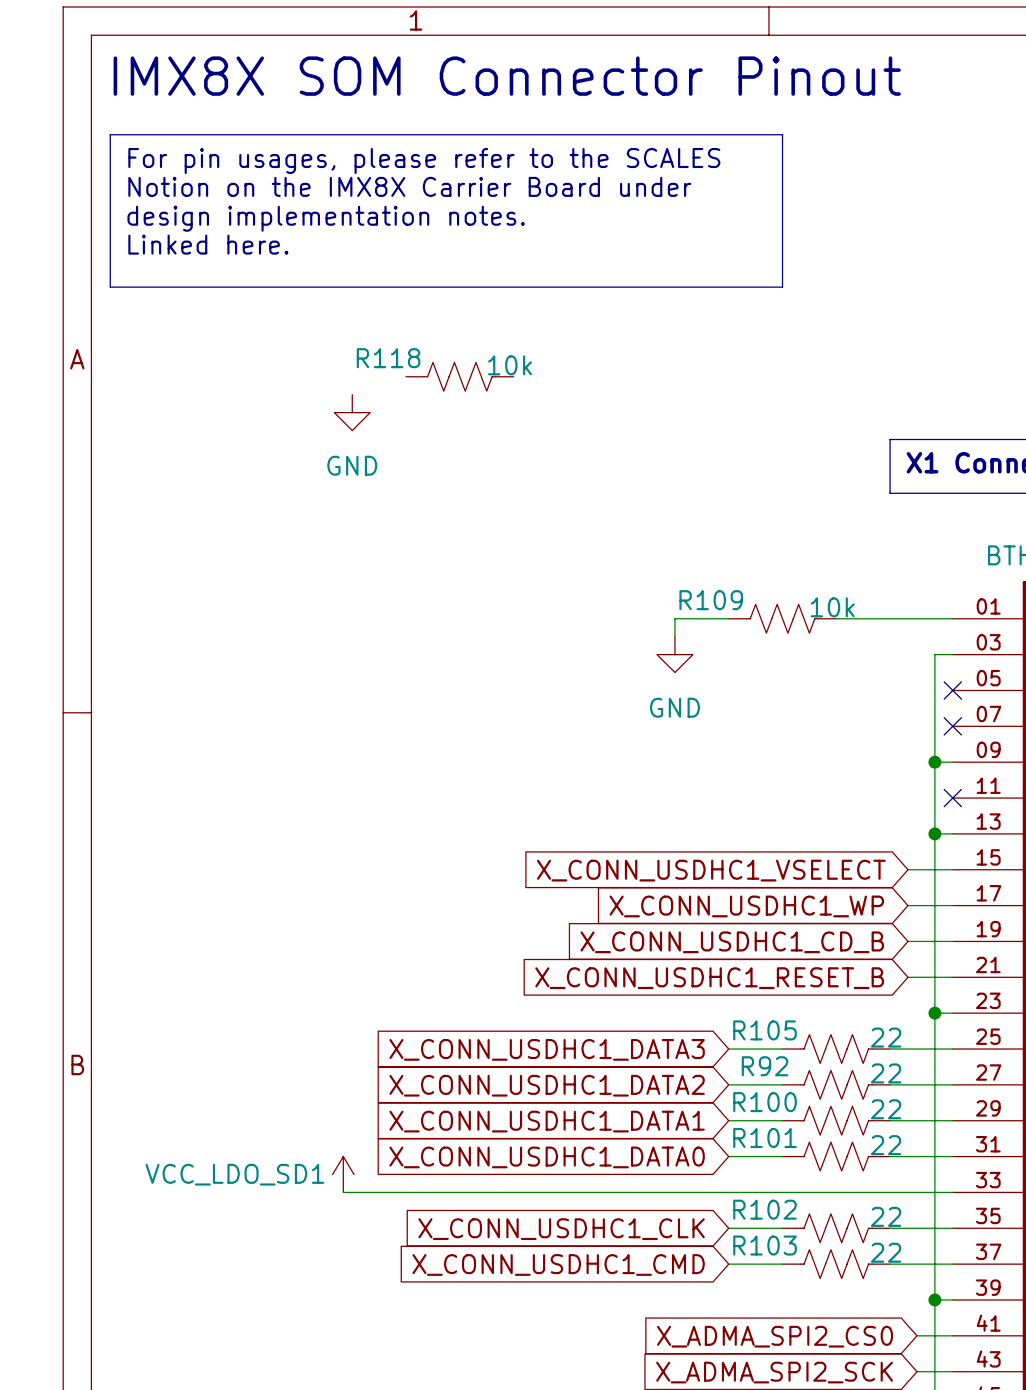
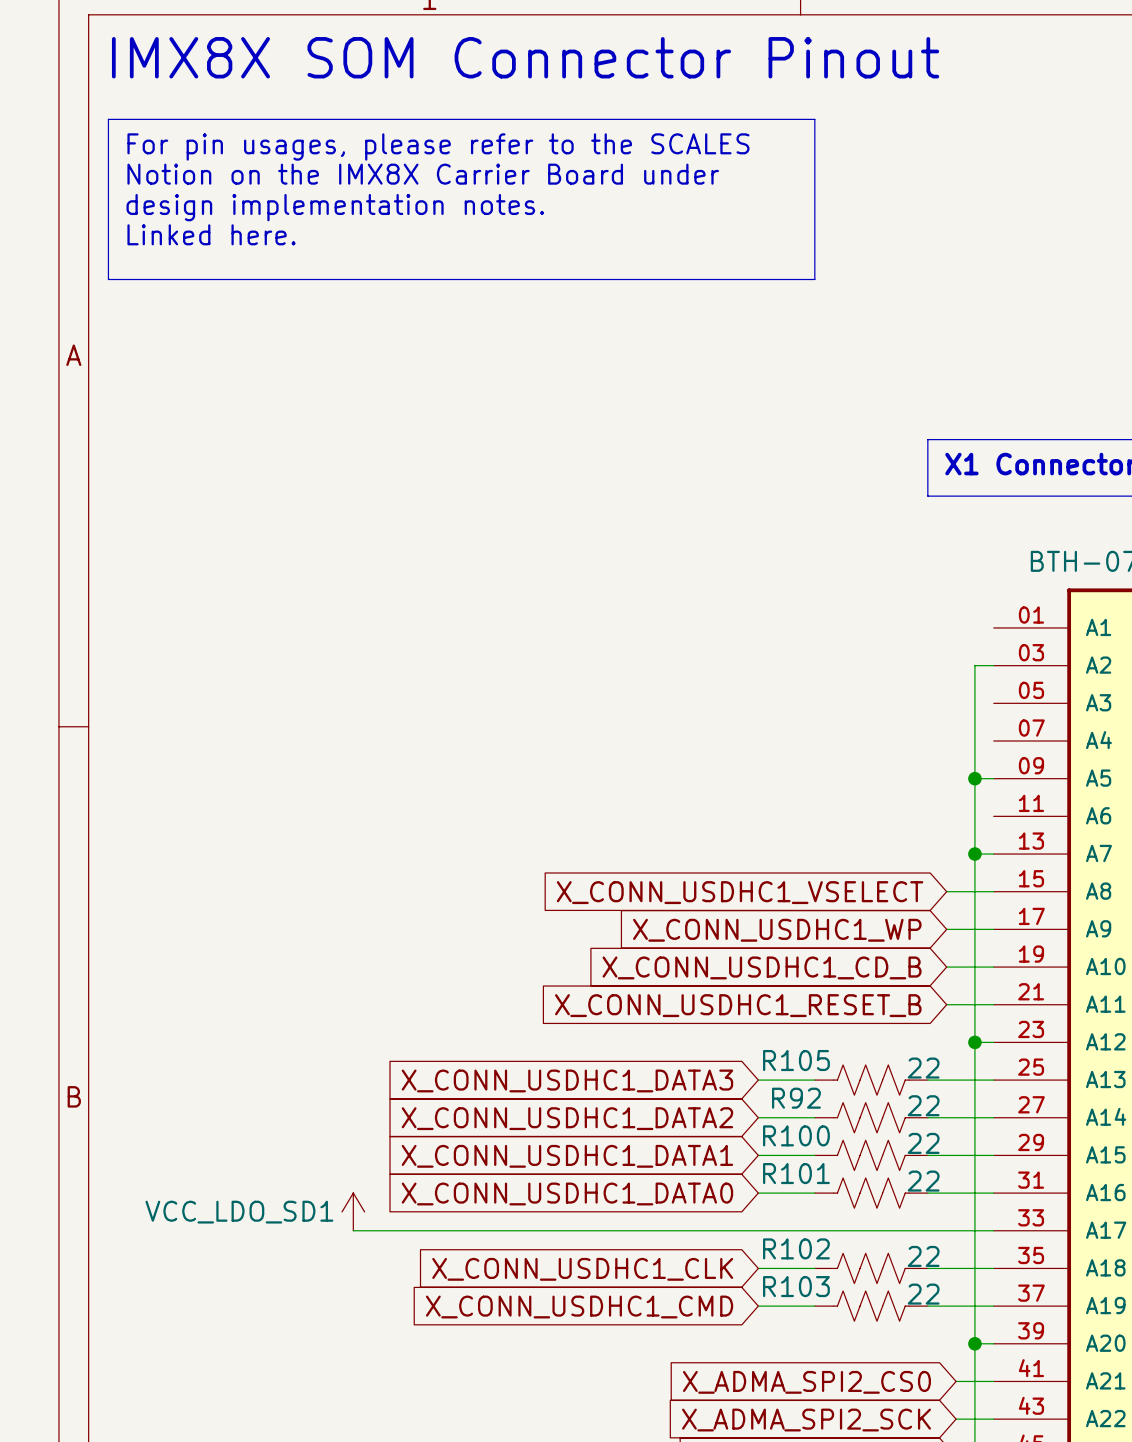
R118: 10k (459, 376) -> none
power symbol: GND (352, 412) -> none
wire: (728, 618) (674, 618) (674, 636) -> none
R109: 10k (782, 618) -> none
wire: (836, 618) (952, 618) -> none
power symbol: GND (674, 654) -> none
no-connect mark: (952, 690) -> none
no-connect mark: (952, 726) -> none
no-connect mark: (952, 798) -> none

